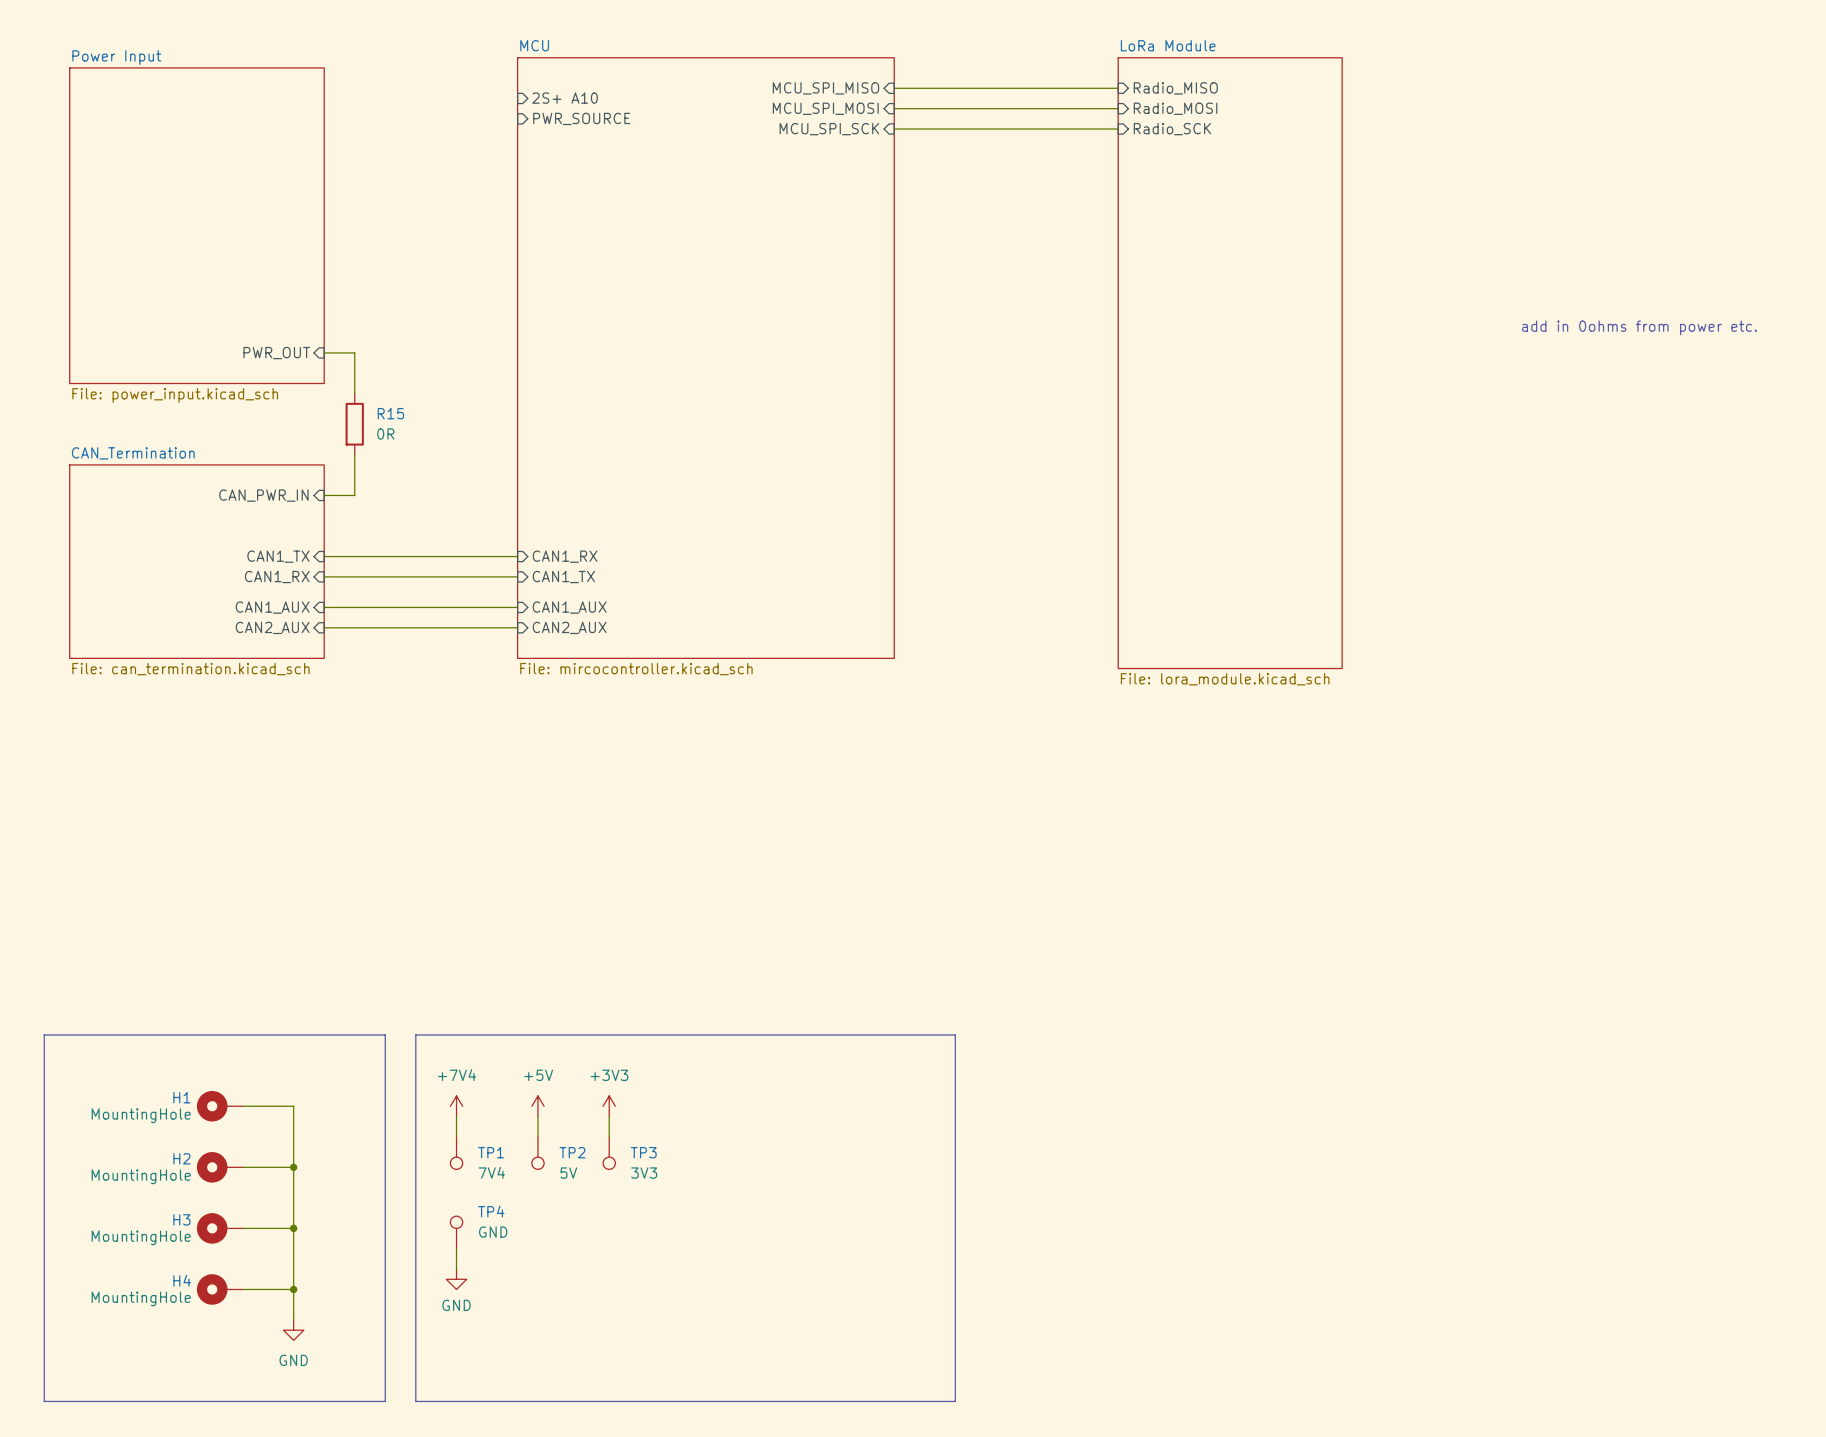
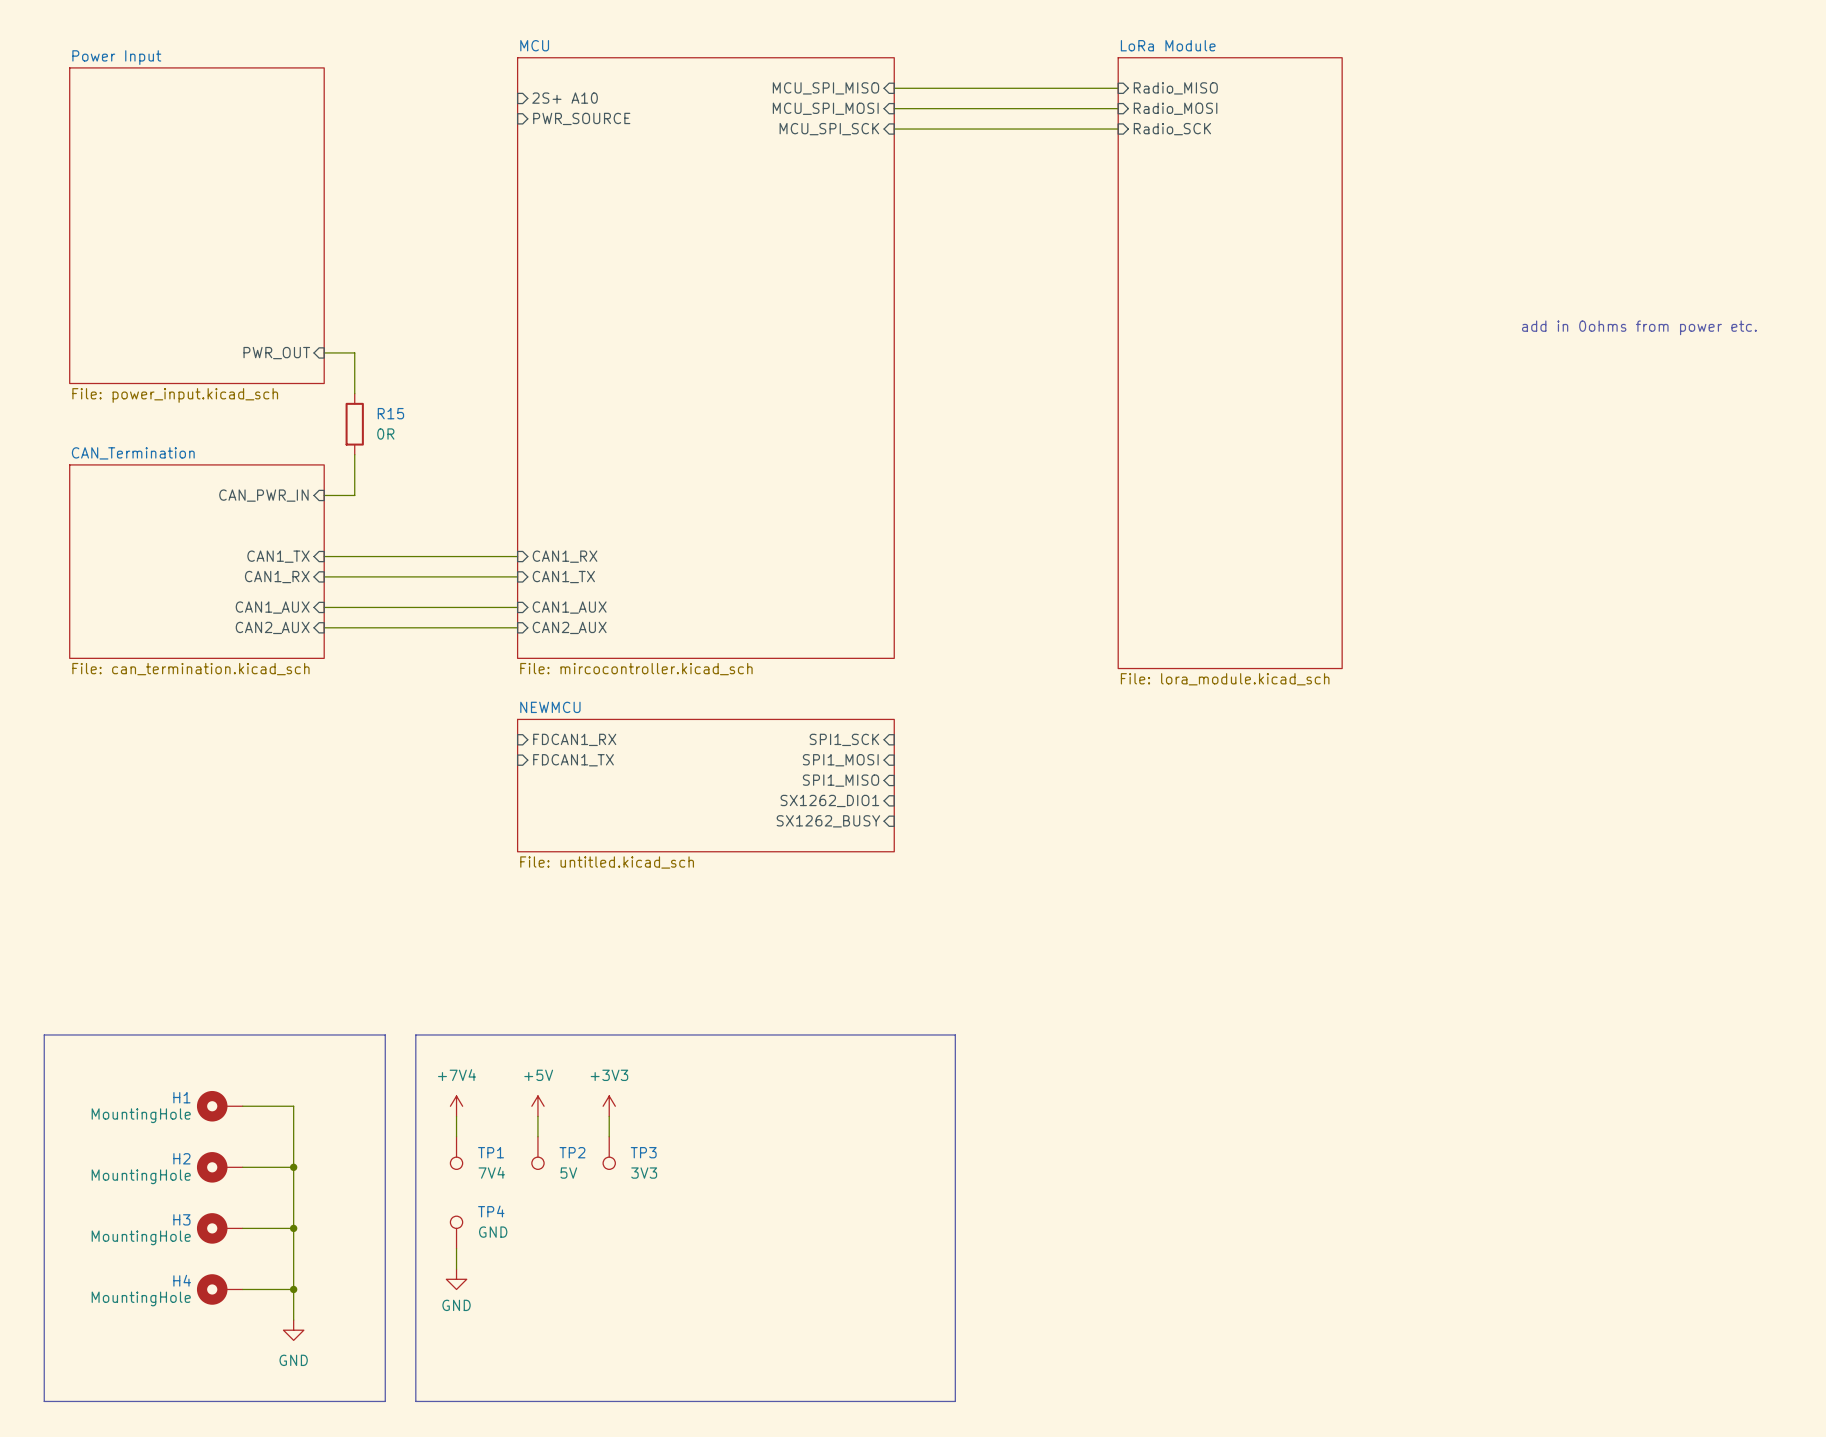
sheet pin: none -> FDCAN1_RX (574, 739)
sheet pin: none -> SPI1_SCK (844, 739)
sheet pin: none -> FDCAN1_TX (573, 760)
sheet pin: none -> SPI1_MOSI (840, 760)
sheet pin: none -> SPI1_MISO (841, 780)
sheet NEWMCU: none -> File: untitled.kicad_sch (705, 785)
sheet pin: none -> SX1262_DIO1 (829, 800)
sheet pin: none -> SX1262_BUSY (828, 821)

